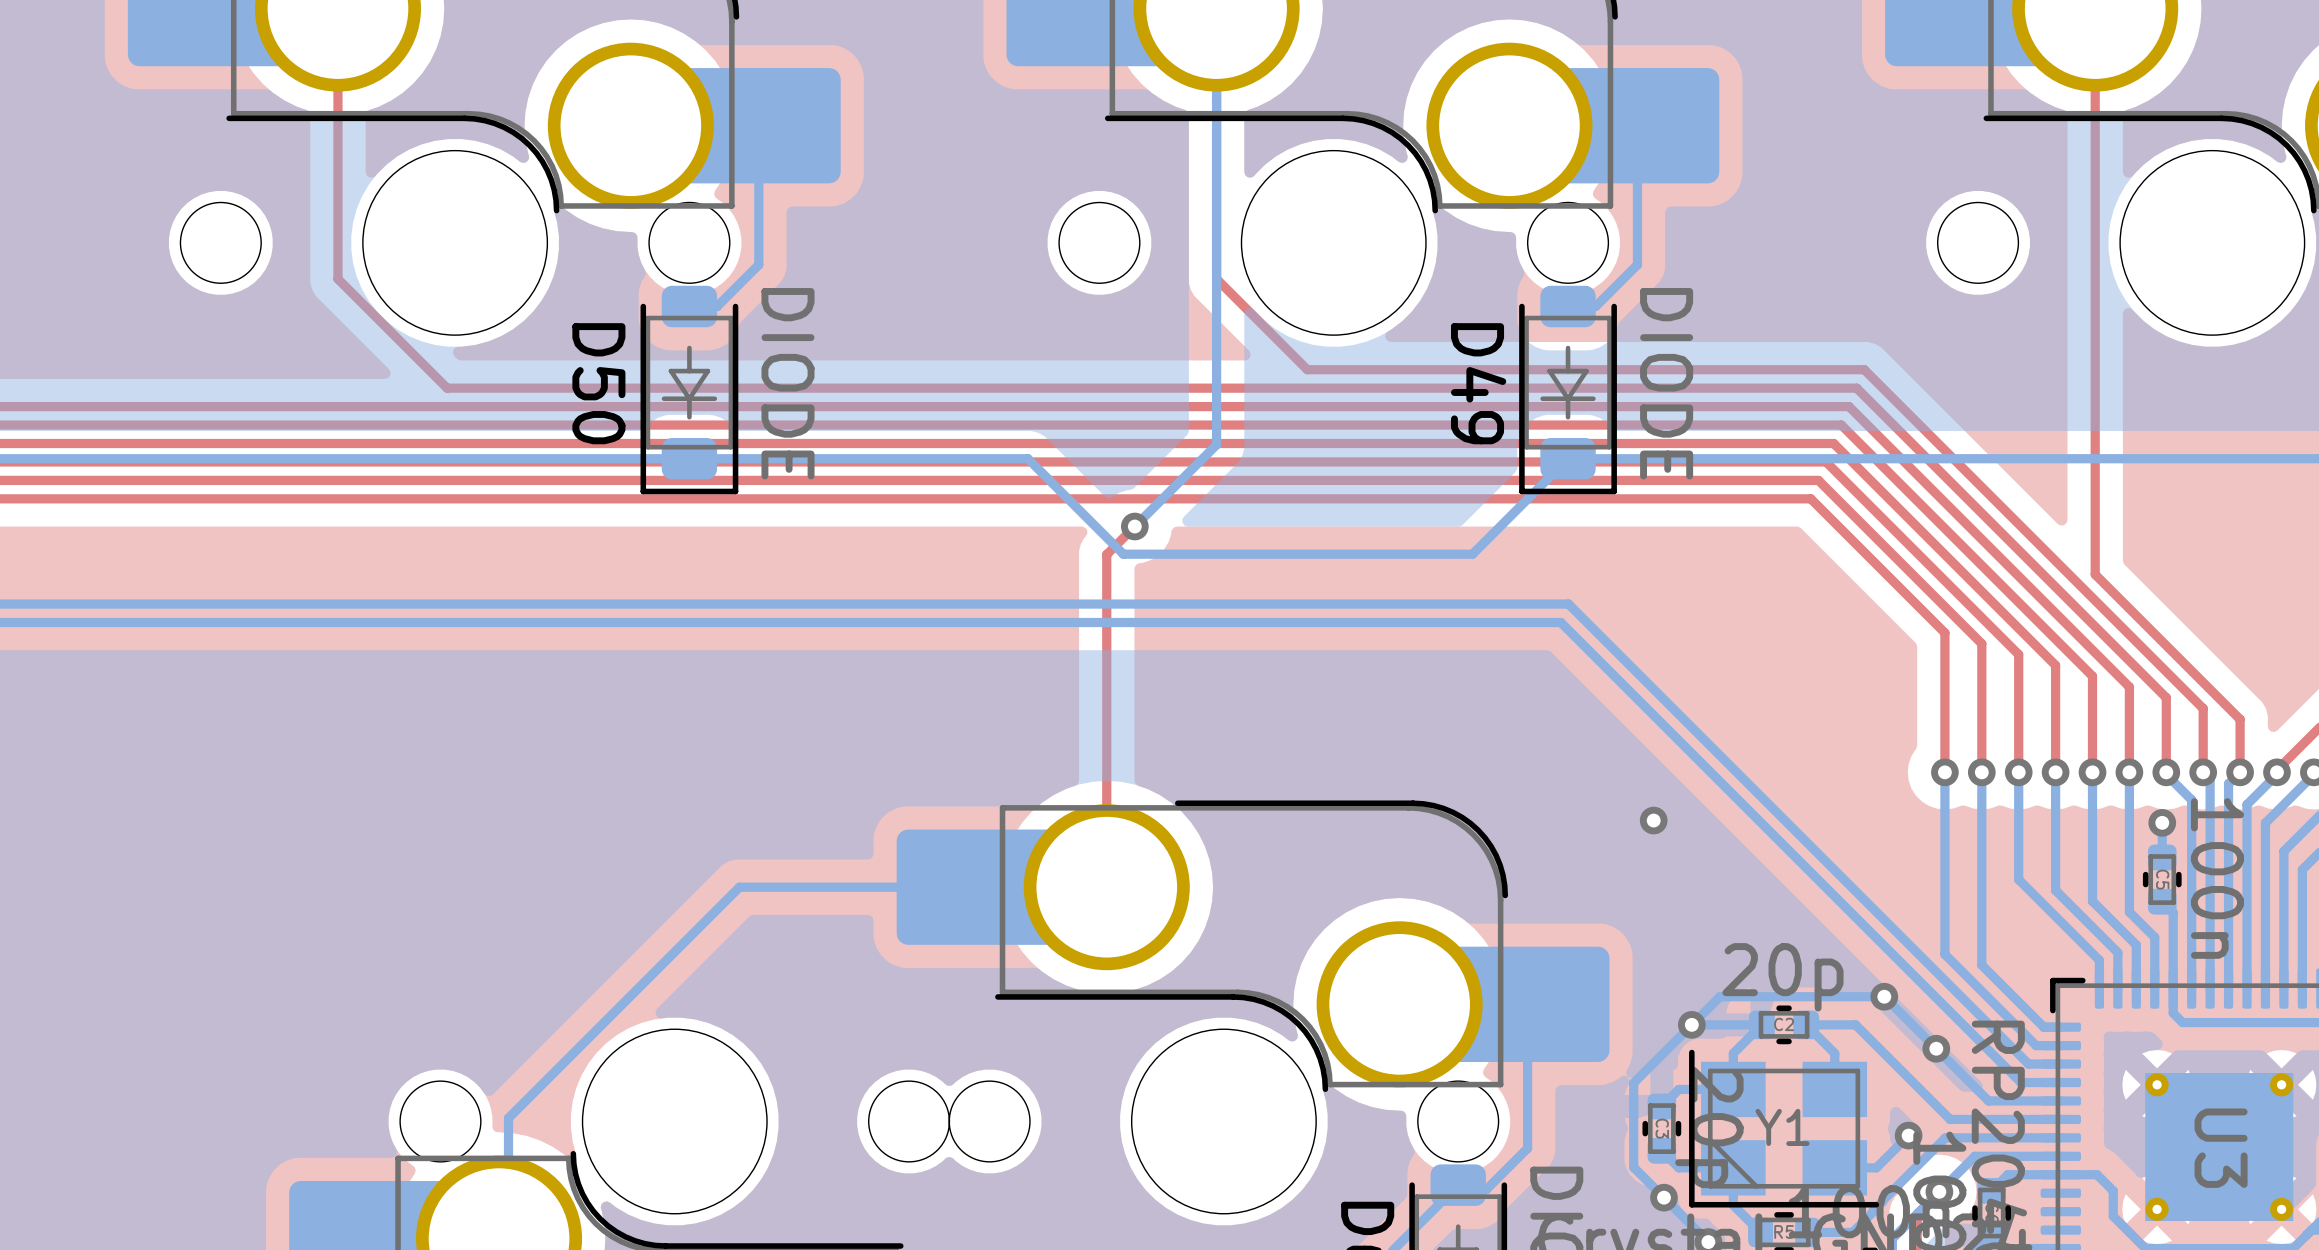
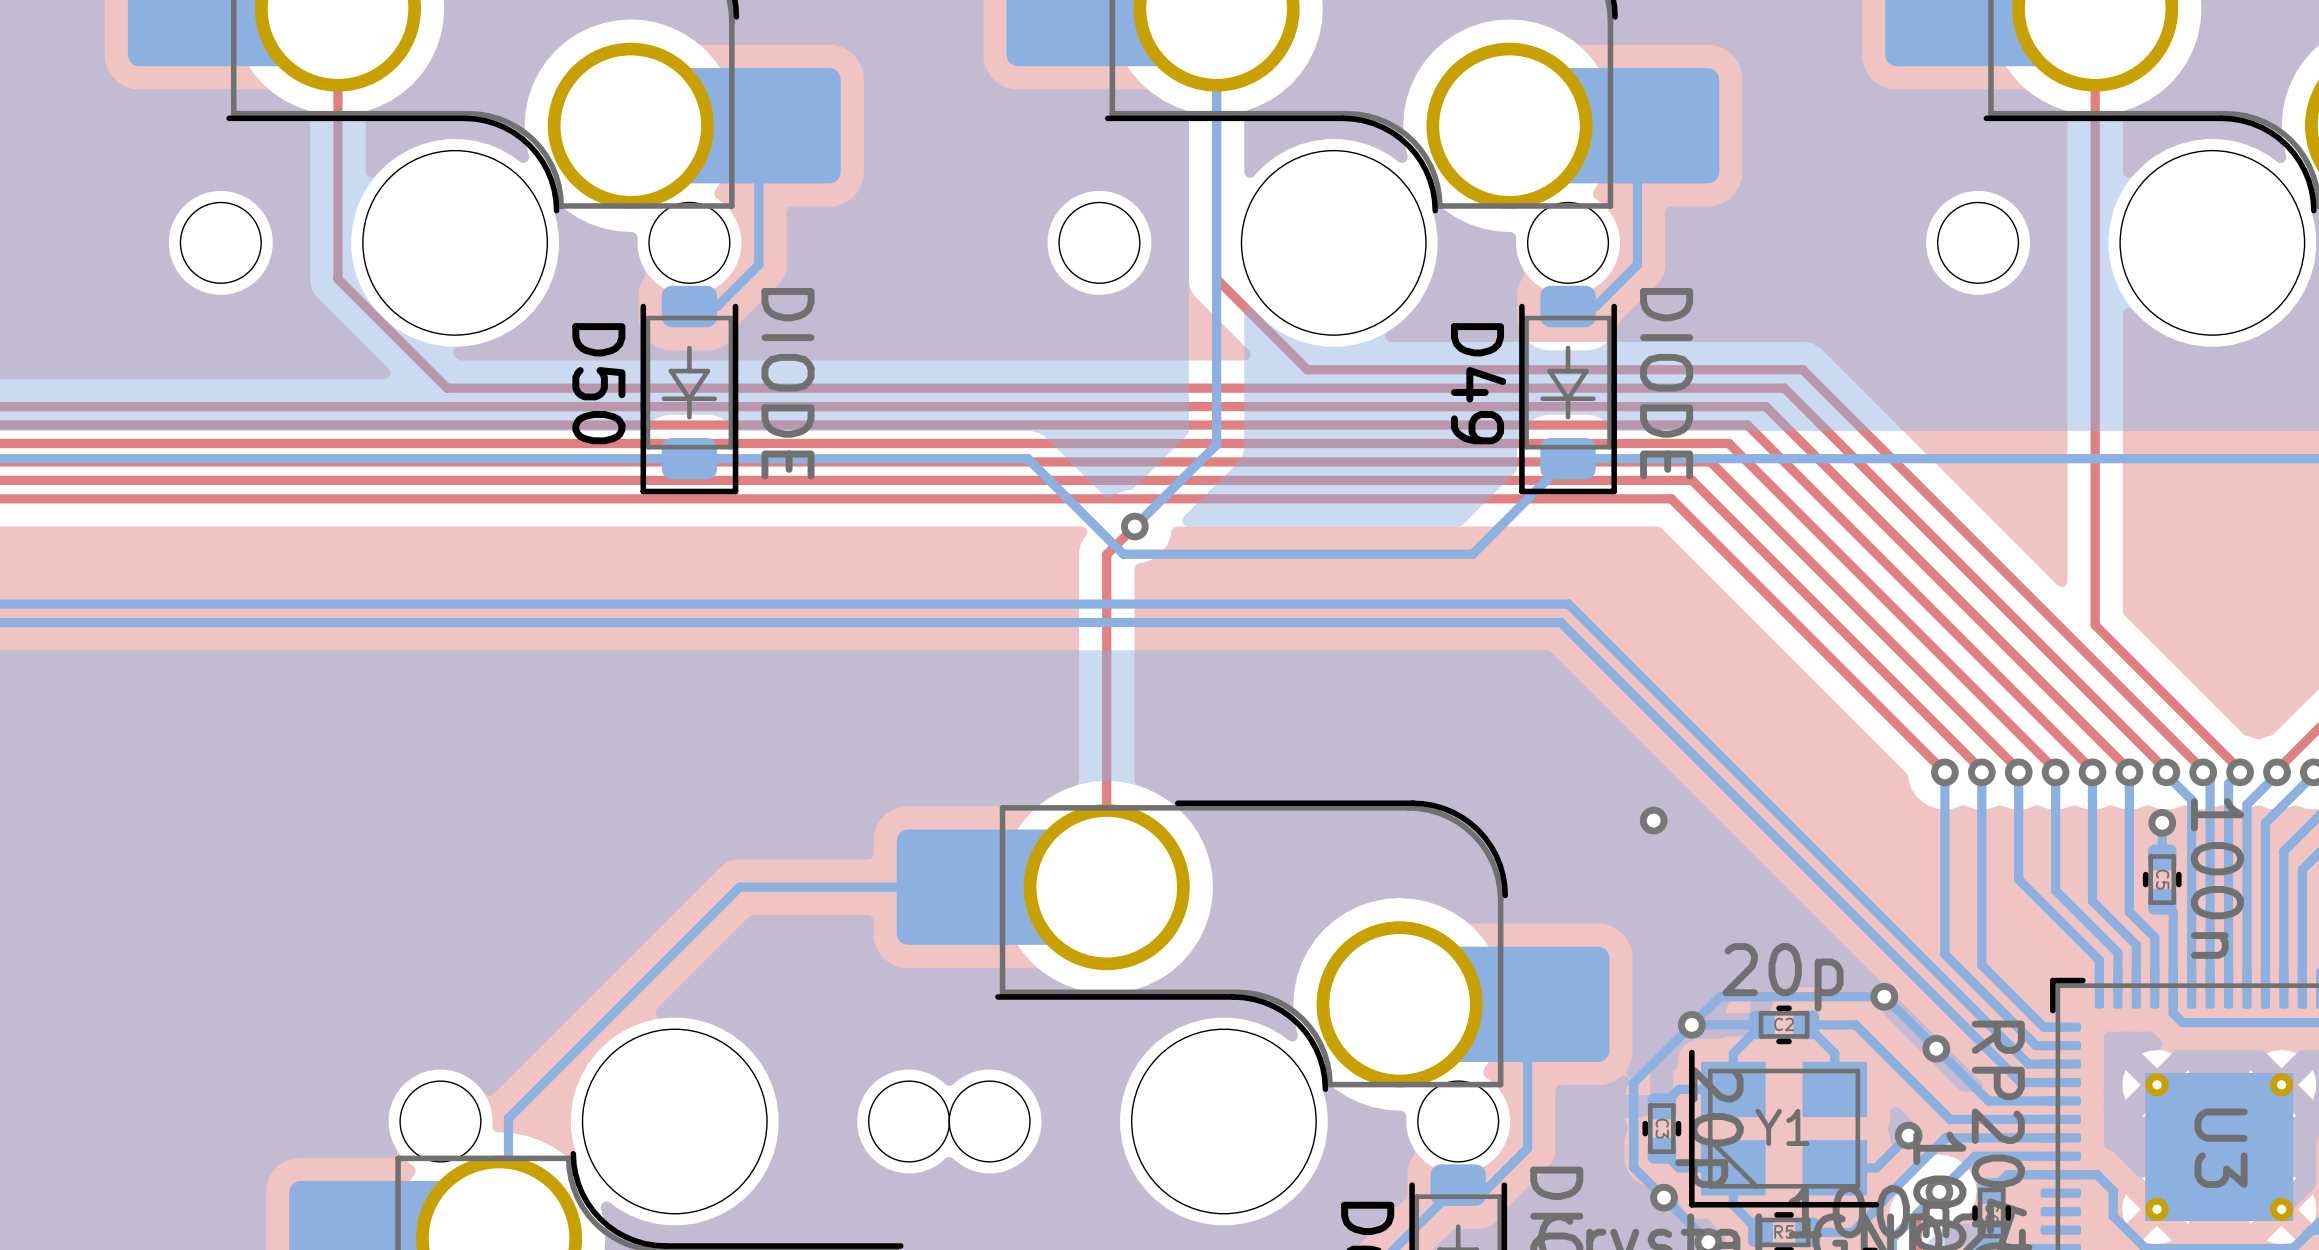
top track: (1802, 369) (1864, 369) (2203, 708) (2203, 770) -> (1802, 369) (2203, 770)
top track: (1784, 388) (1856, 388) (2166, 697) (2166, 770) -> (1784, 388) (2166, 770)
top track: (1765, 406) (1849, 406) (2129, 686) (2129, 770) -> (1765, 406) (2129, 770)
top track: (1747, 425) (1841, 425) (2092, 676) (2092, 770) -> (1747, 425) (2092, 770)
top track: (1729, 443) (1833, 443) (2055, 665) (2055, 770) -> (1729, 443) (2055, 770)
top track: (1710, 461) (1826, 461) (2018, 654) (2018, 770) -> (1710, 461) (2018, 770)
top track: (1692, 480) (1818, 480) (1981, 643) (1981, 770) -> (1692, 480) (1981, 770)
top track: (1671, 498) (1810, 498) (1944, 632) (1944, 772) -> (1671, 498) (1944, 772)
top track: (2095, 574) (2240, 719) (2240, 770) -> (2095, 574) (2095, 625) (2240, 770)

